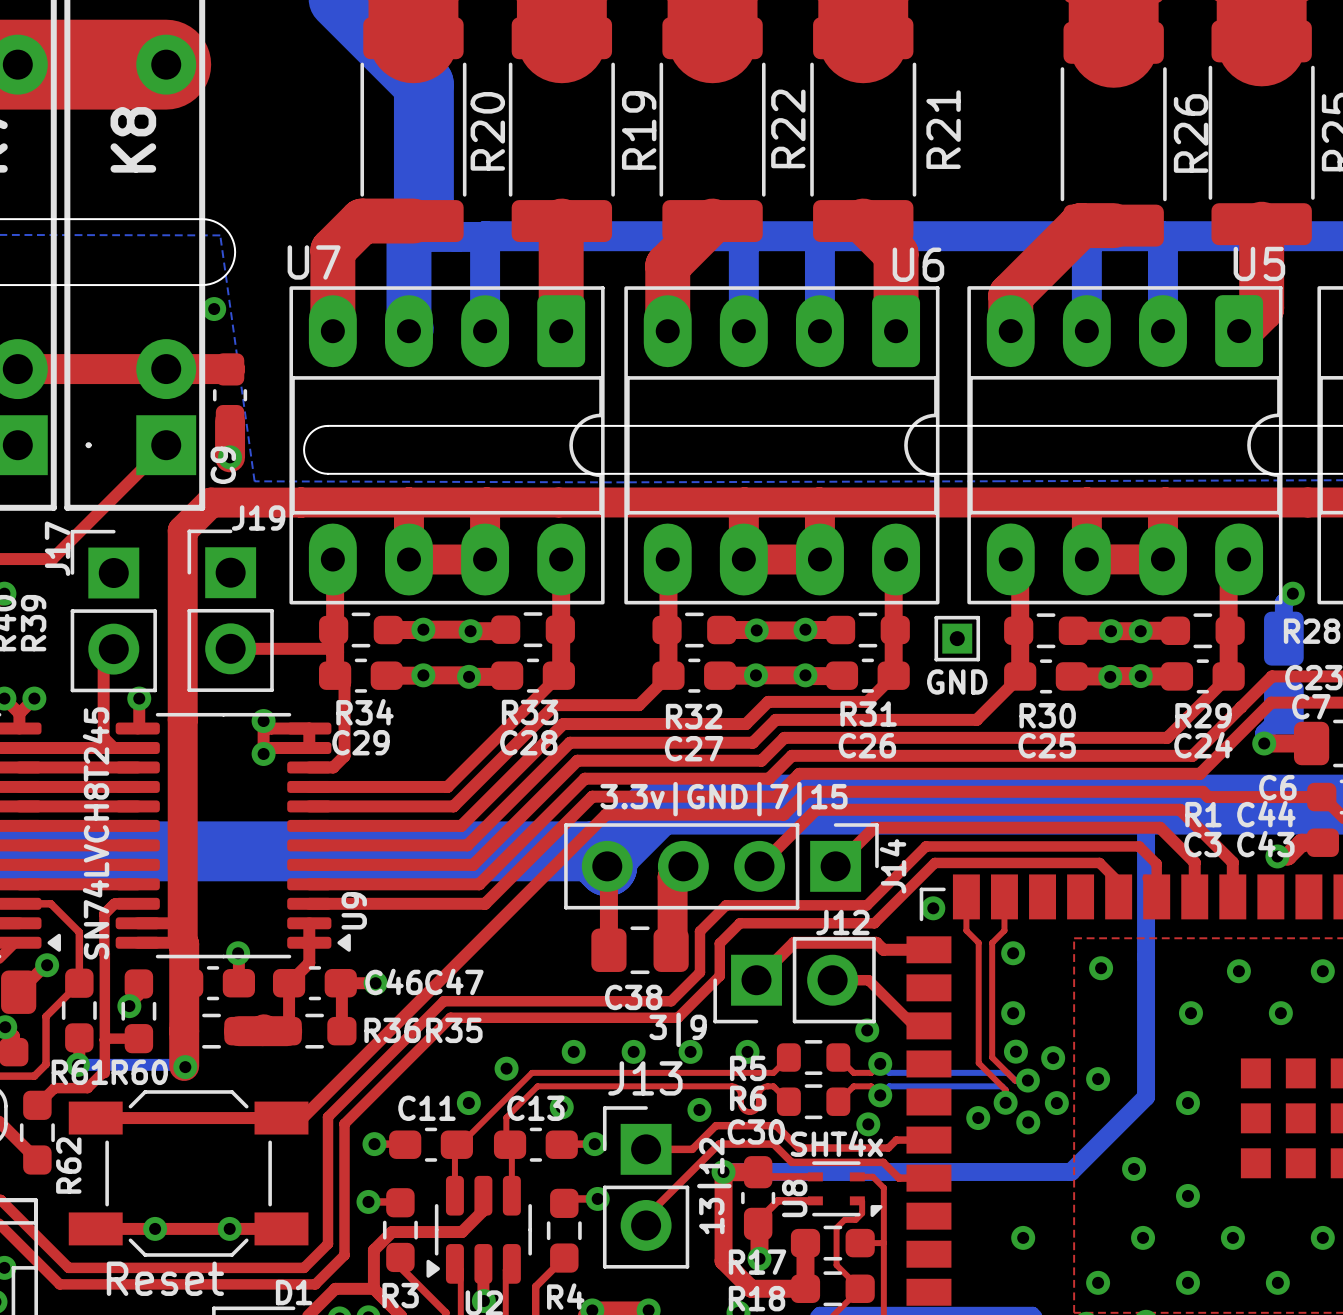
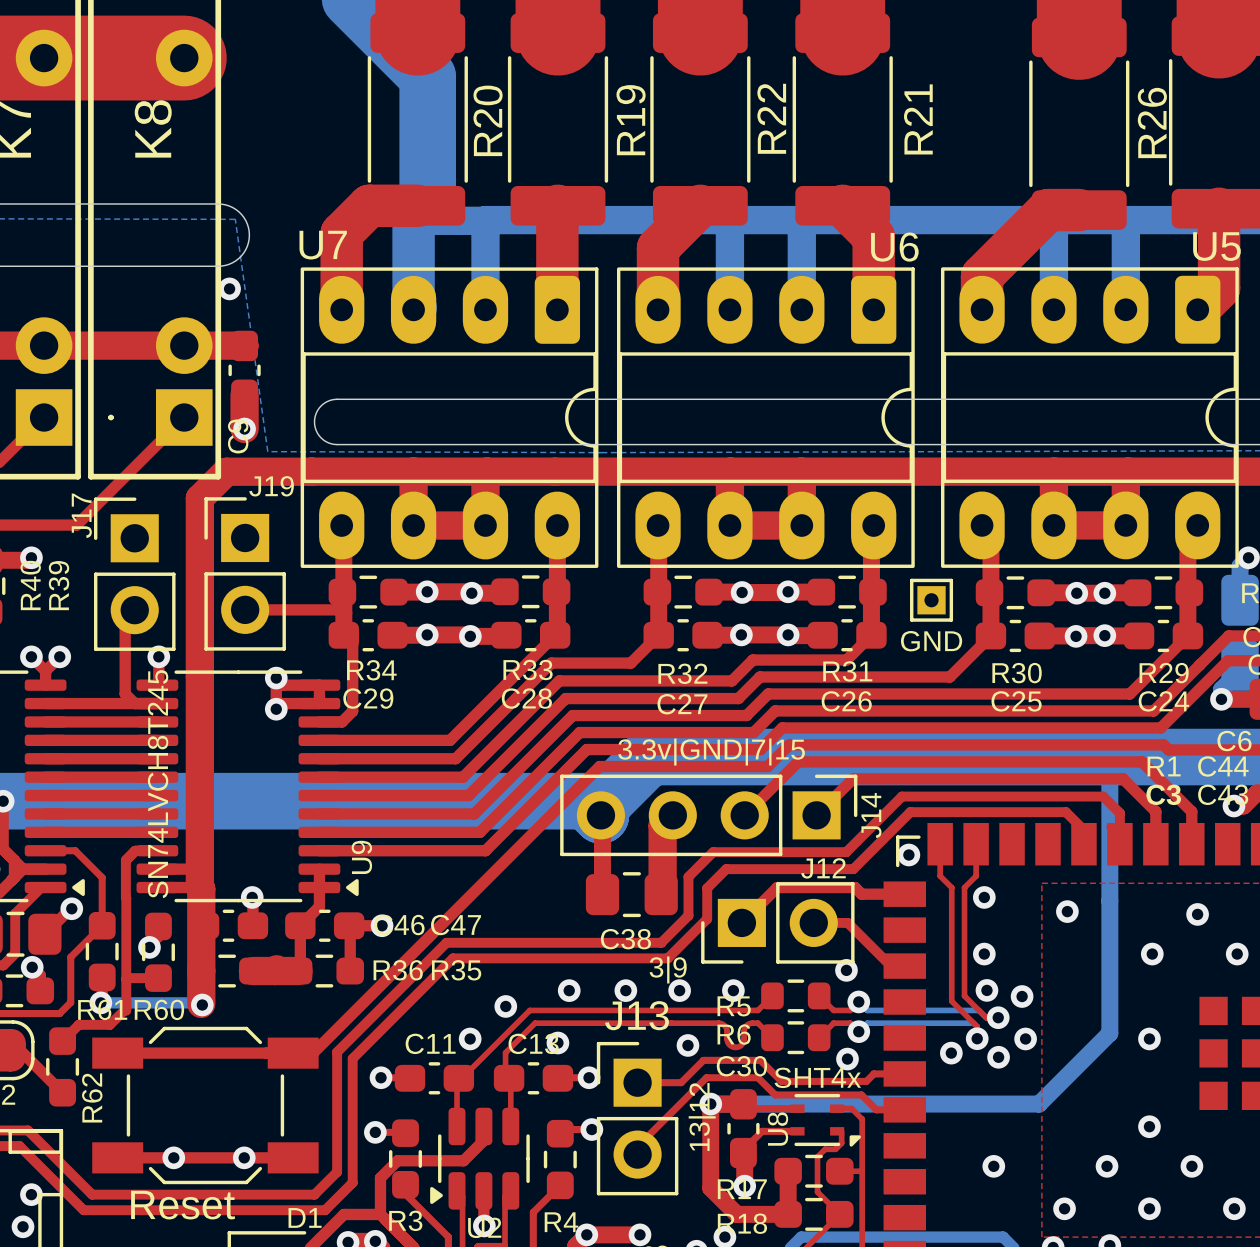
U9 value position: SN74LVCH8T245 (96, 833) -> SN74LVCH8T245 (158, 784)
via: (1098, 1079) -> none
via: (1134, 1168) -> none

